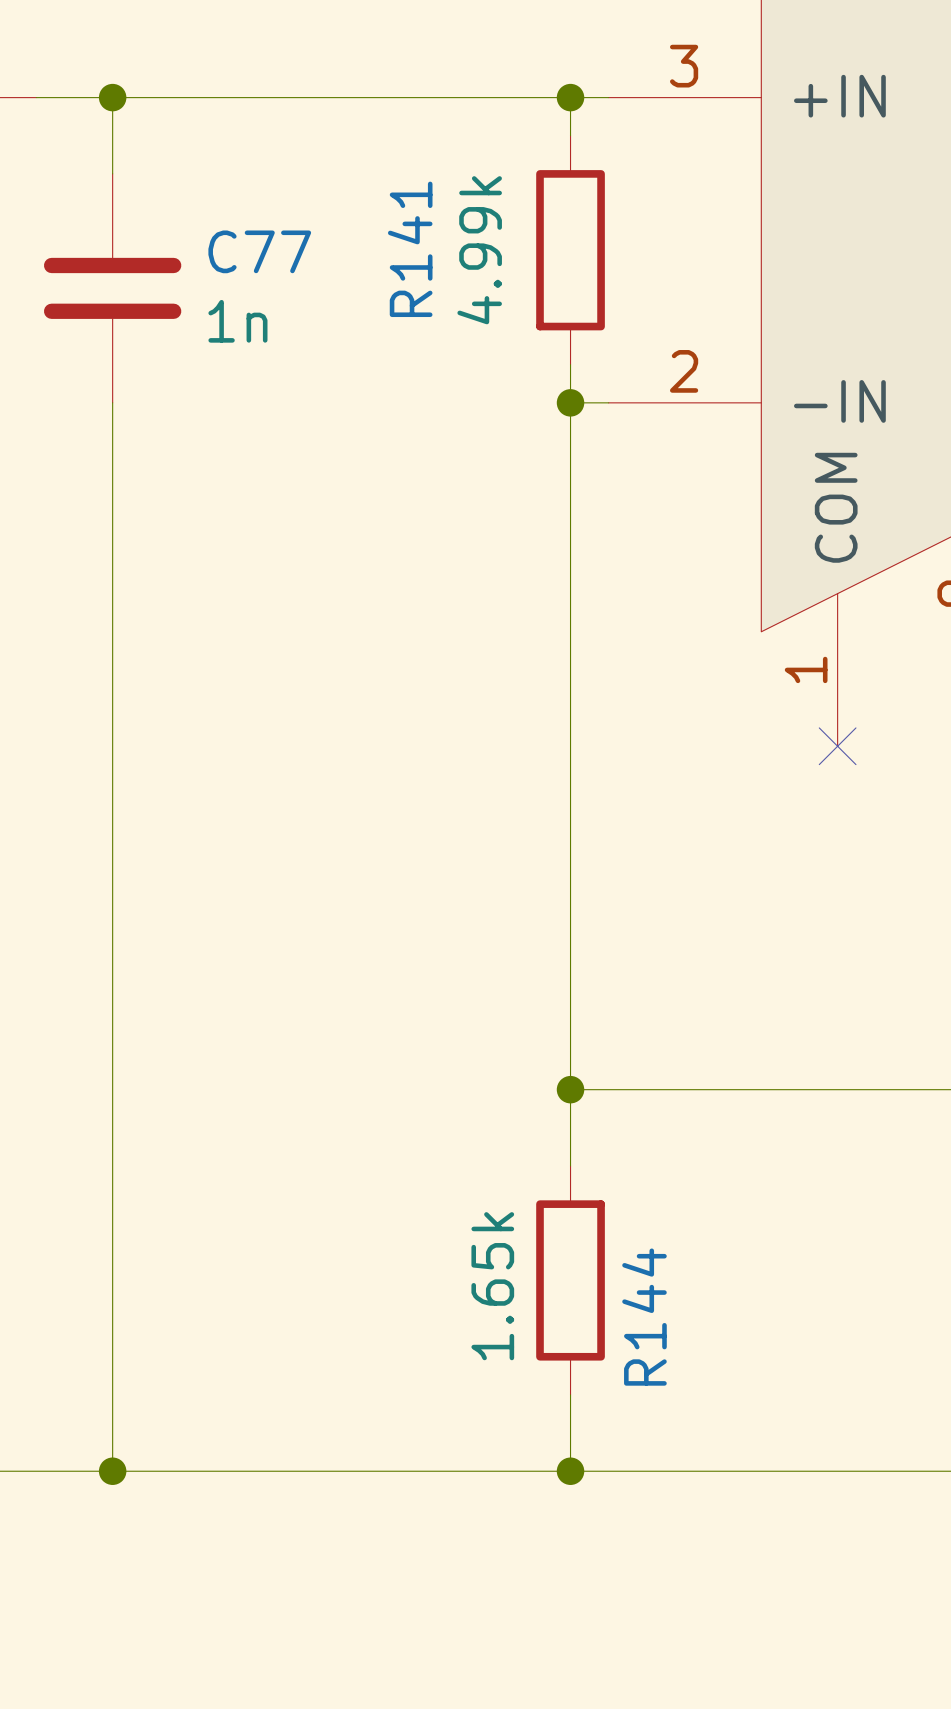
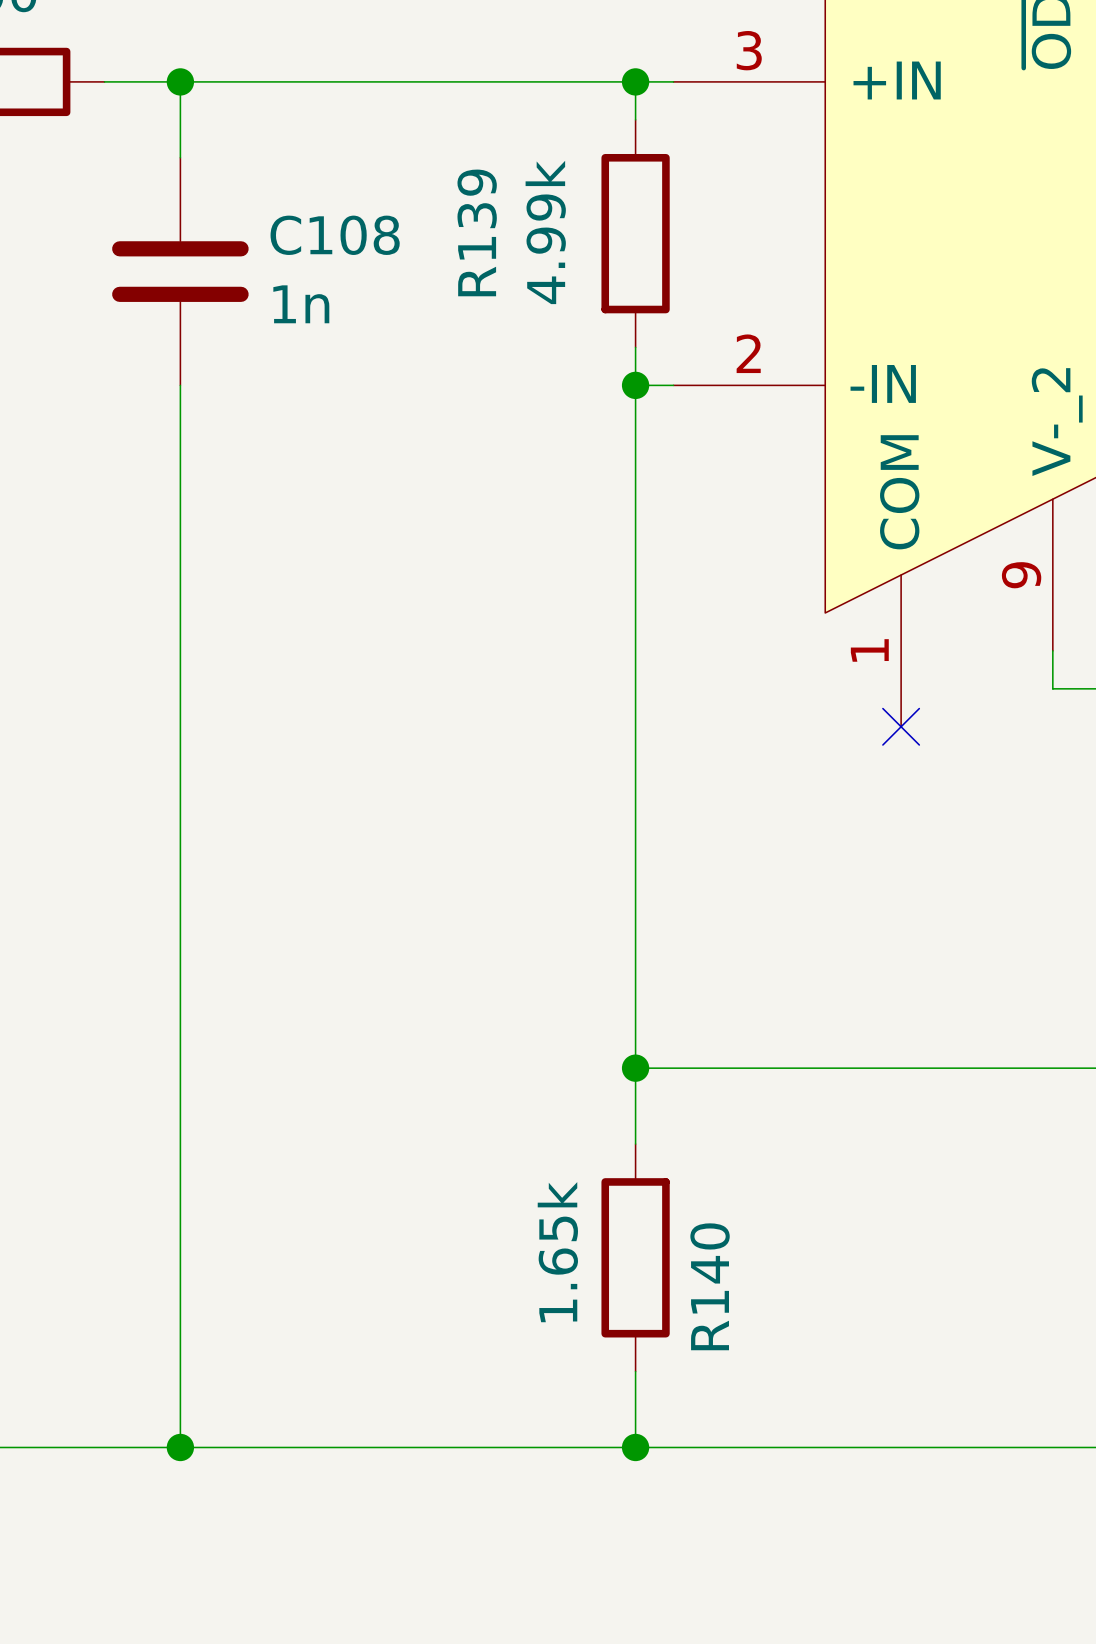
R141 name: R141 (410, 249) -> R139 (477, 232)
C77 name: C77 (259, 251) -> C108 (335, 235)
R144 name: R144 (644, 1317) -> R140 (710, 1286)

